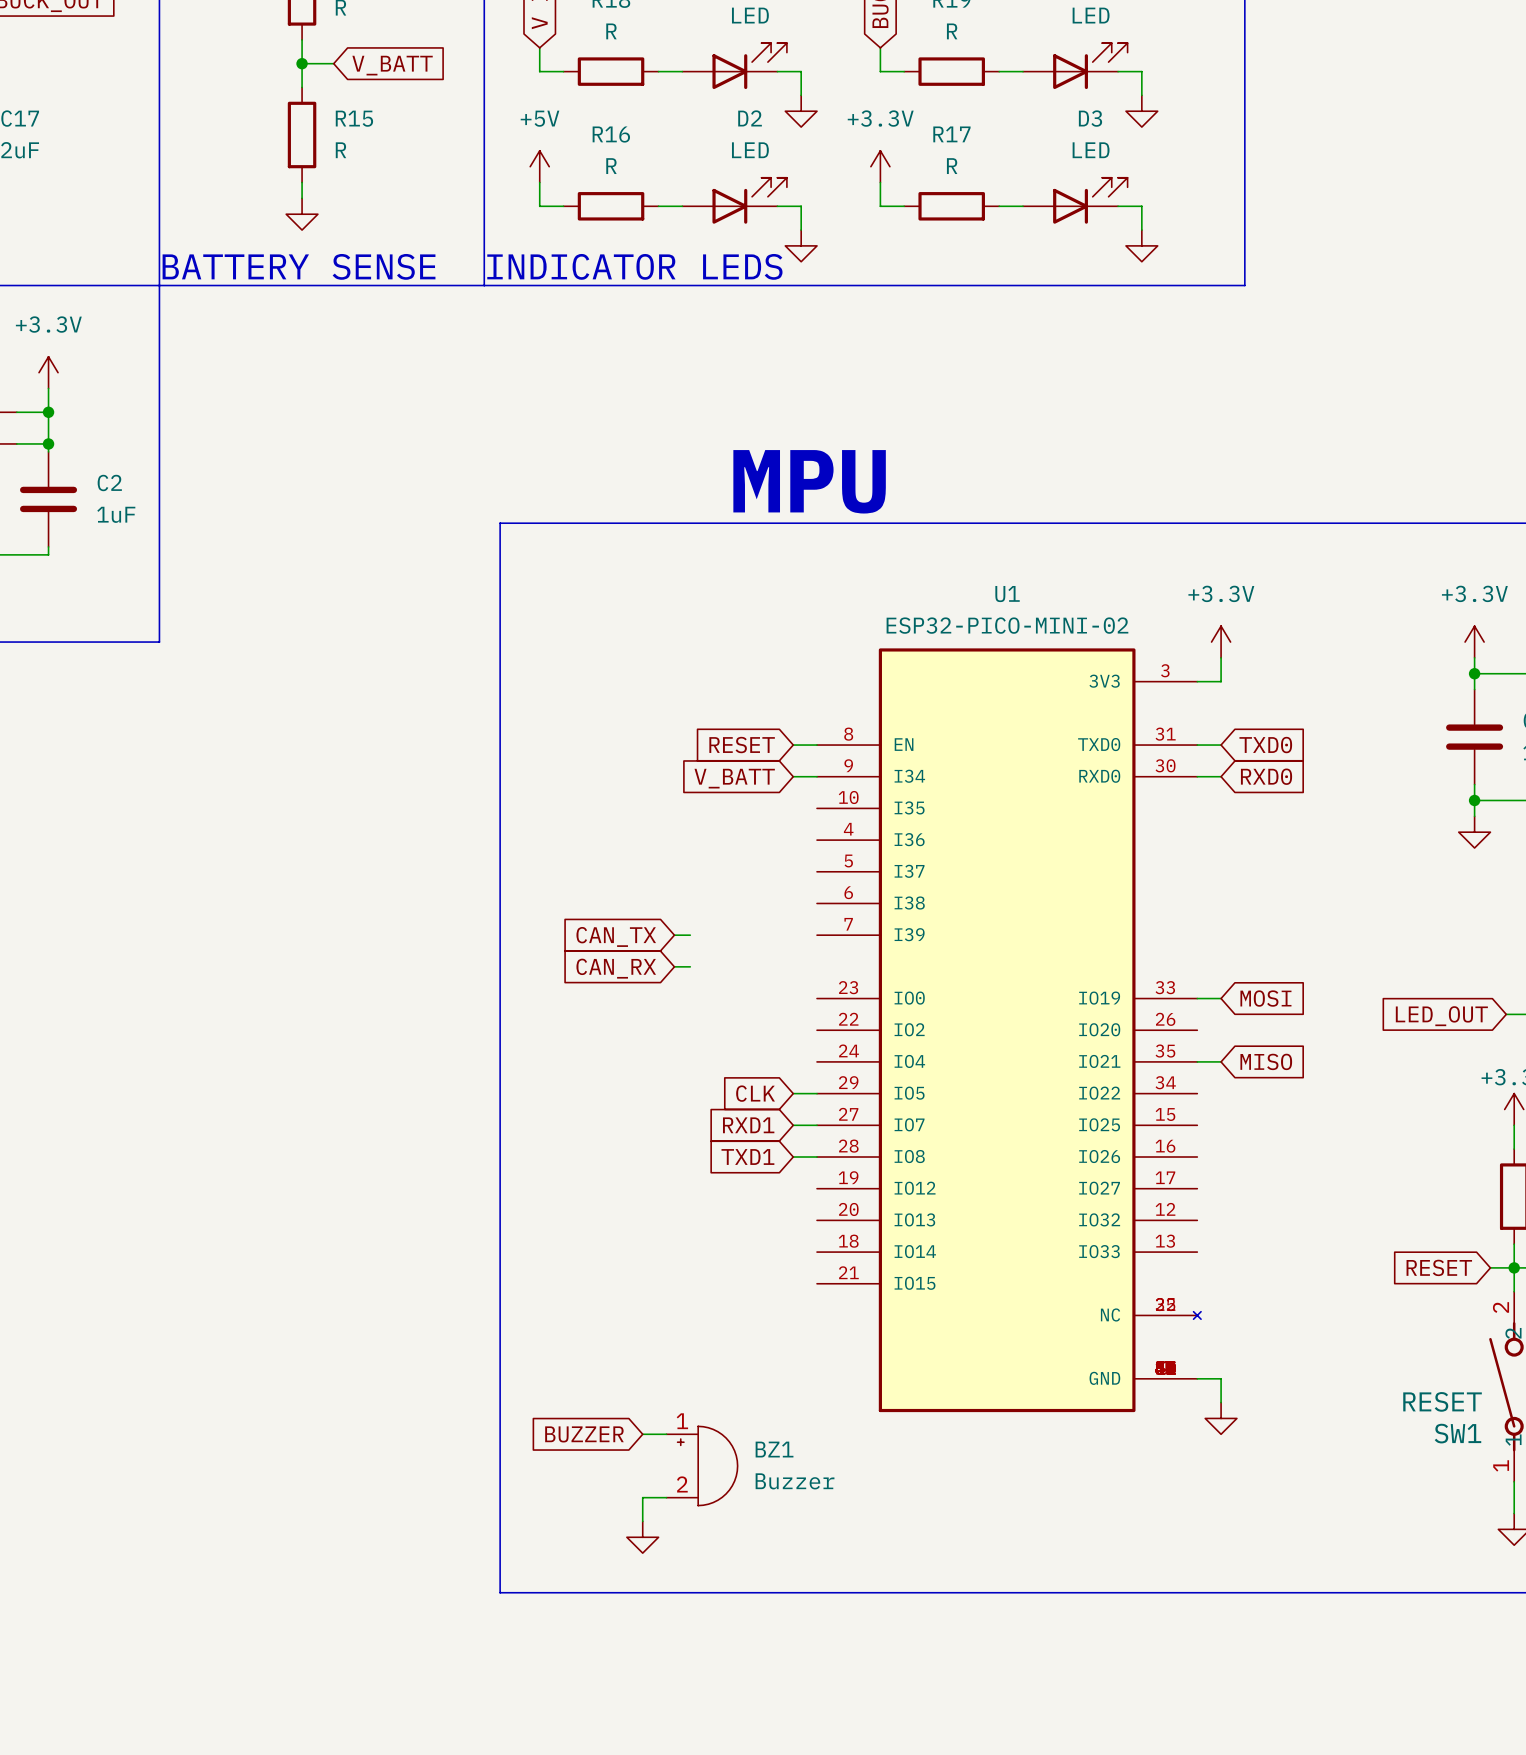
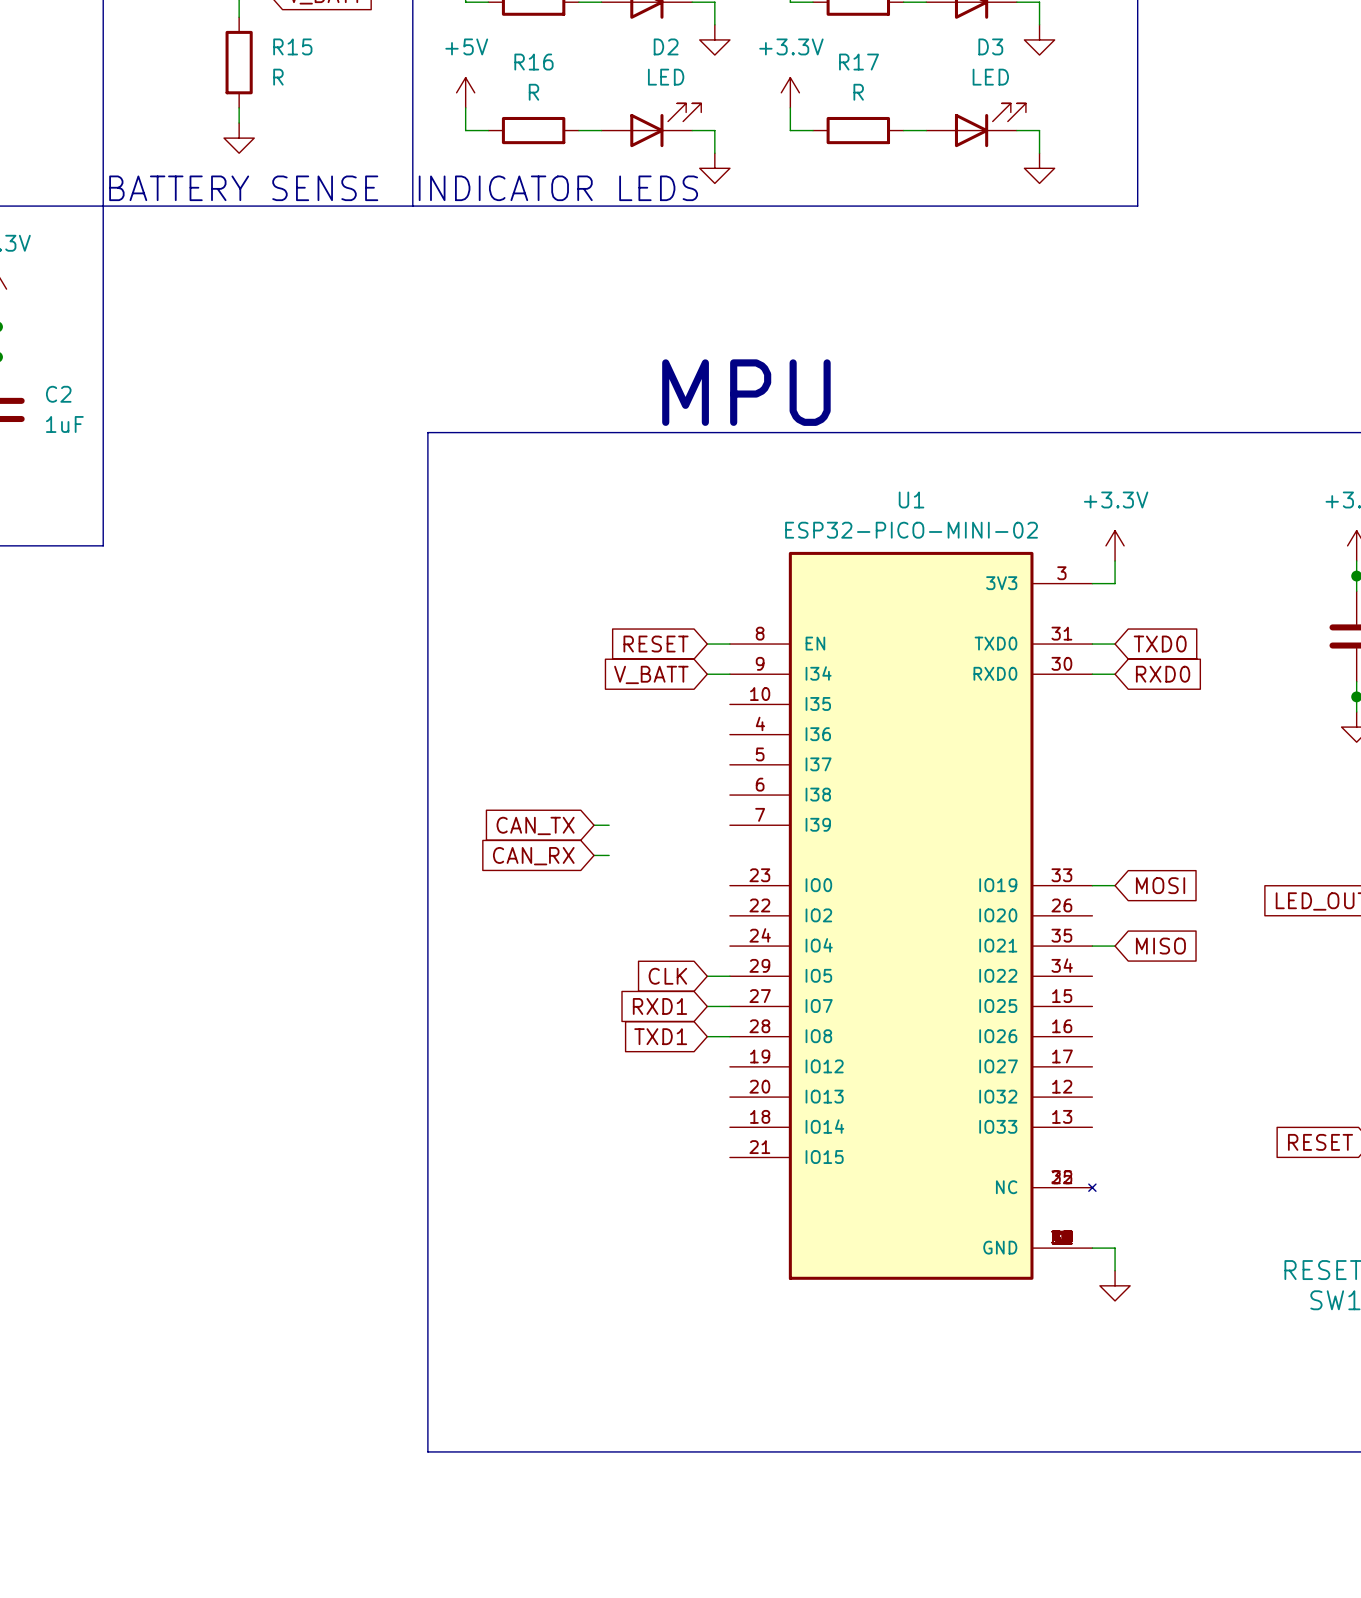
global label: BUZZER (584, 1434) -> none
wire: (642, 1434) (666, 1434) -> none
BZ1: Buzzer (702, 1465) -> none
wire: (666, 1497) (642, 1497) (642, 1521) -> none
power symbol: (642, 1537) -> none

